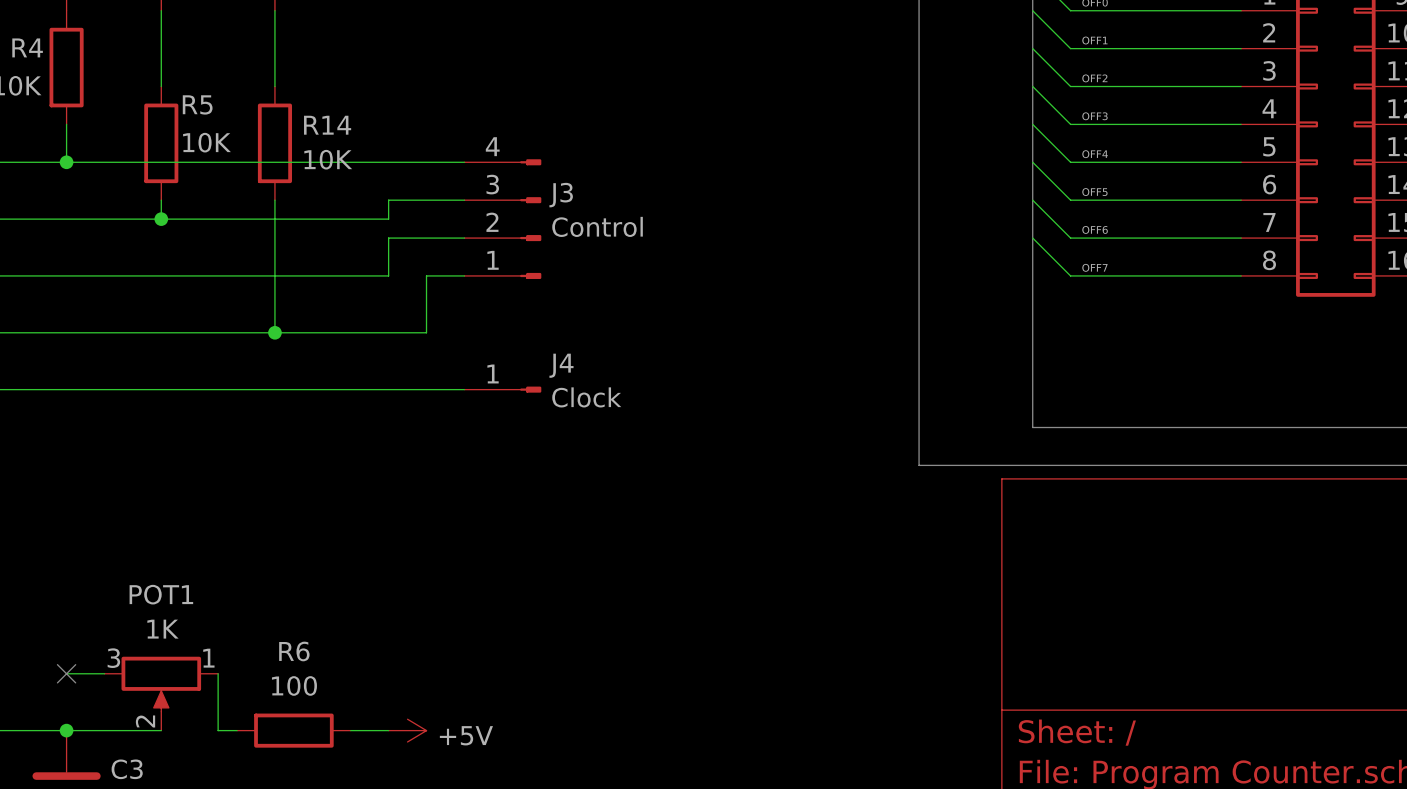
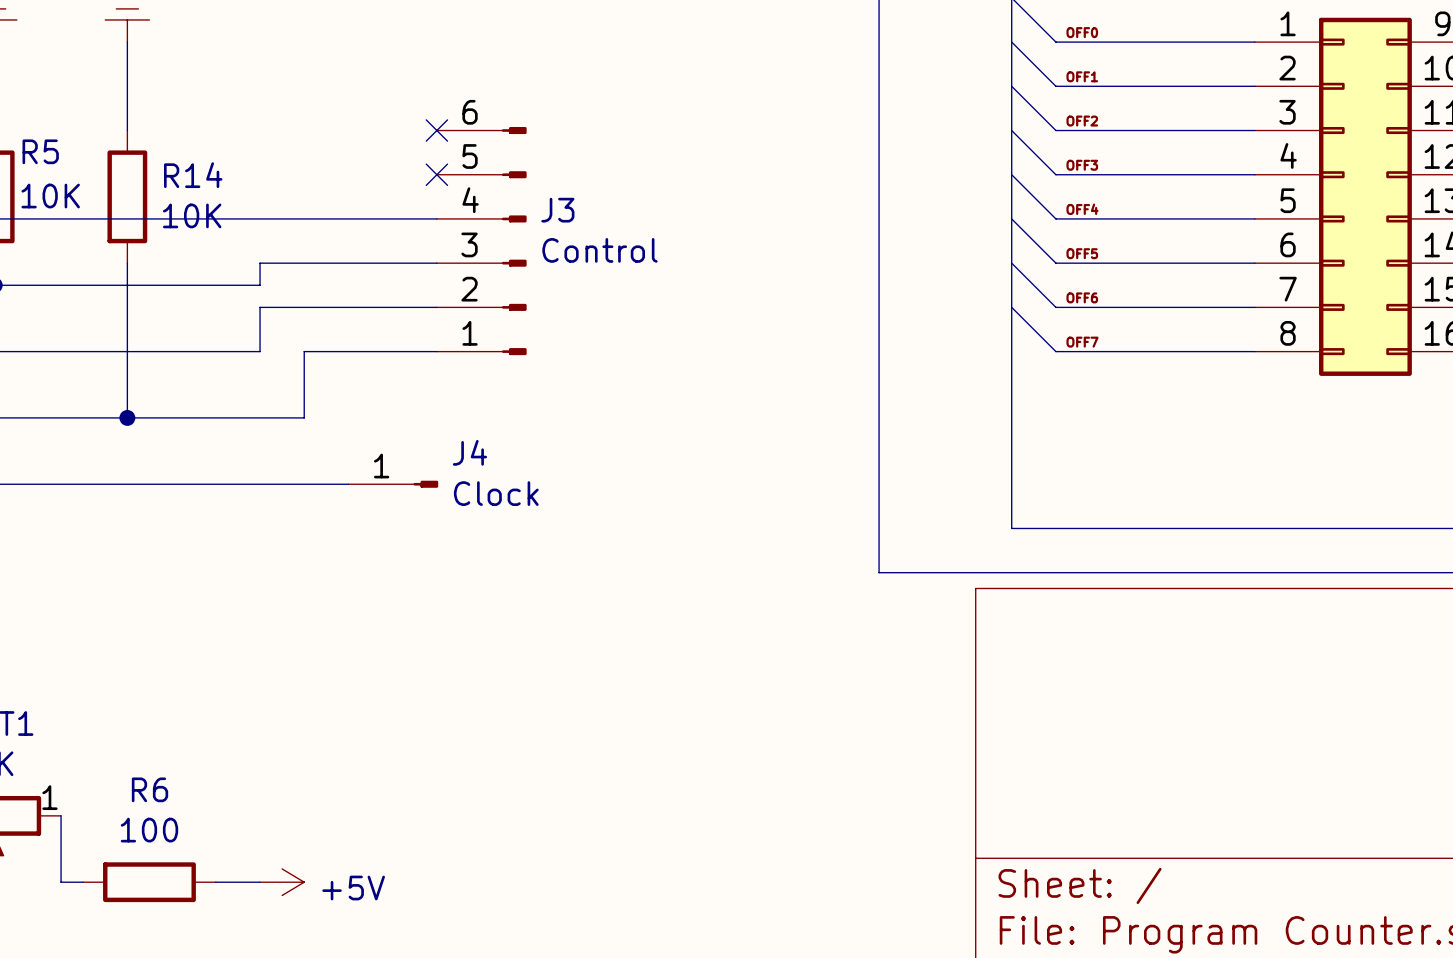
no-connect mark: none -> (436, 130)
no-connect mark: none -> (436, 174)
J3 symbol: [464, 159, 542, 279] -> [436, 126, 527, 356]

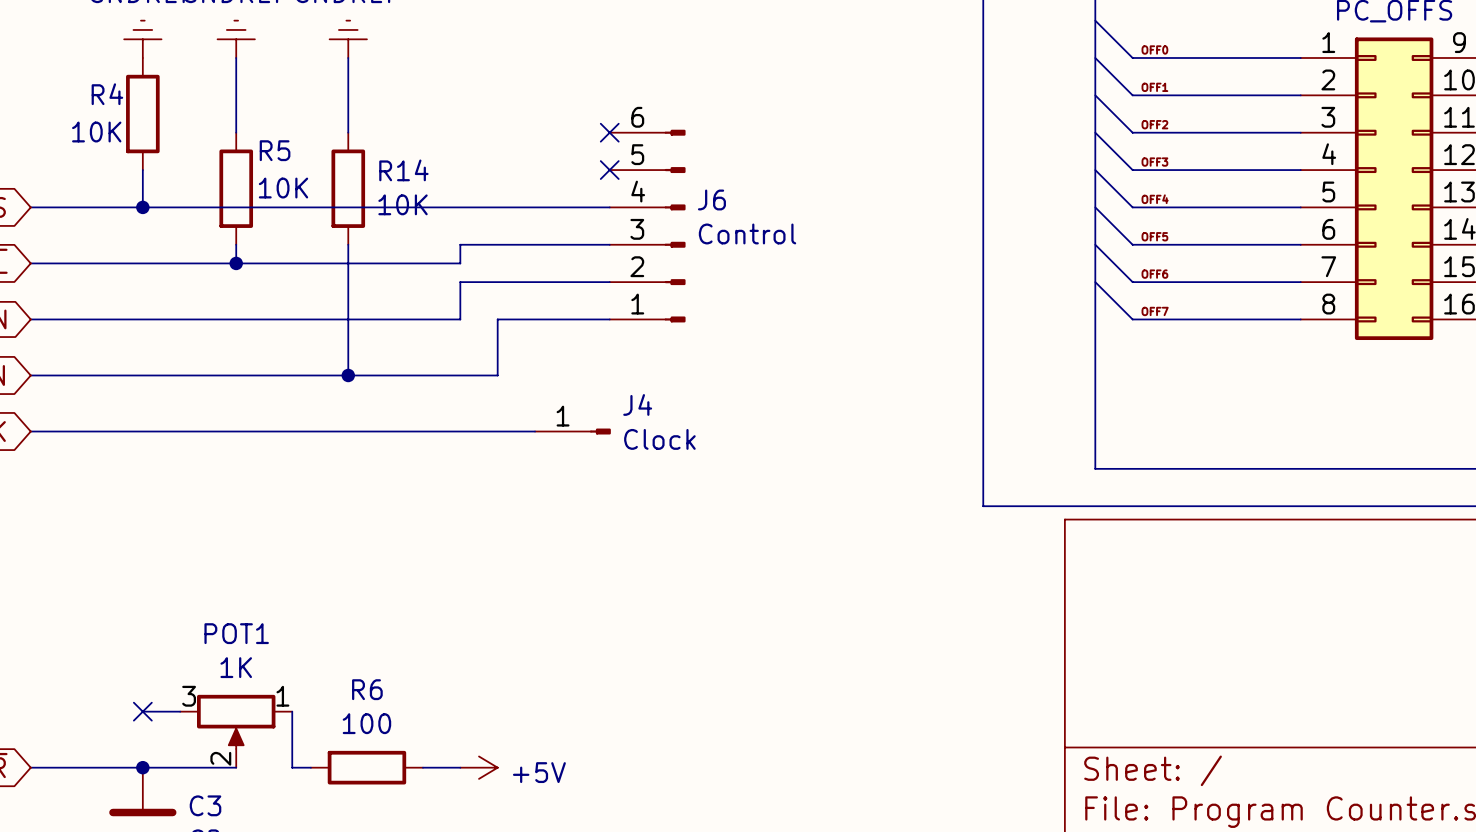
J3 name: J3 (557, 210) -> J6 (711, 199)

